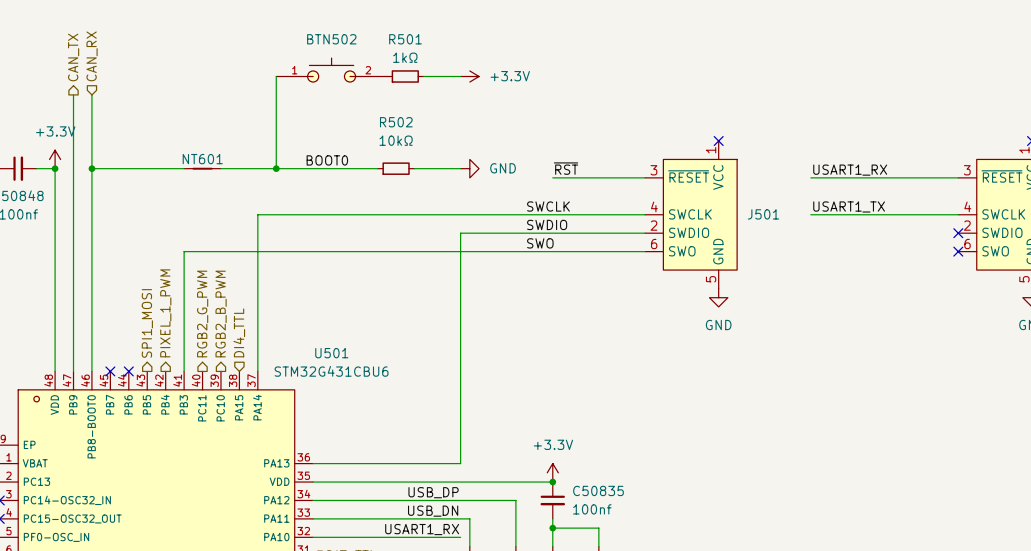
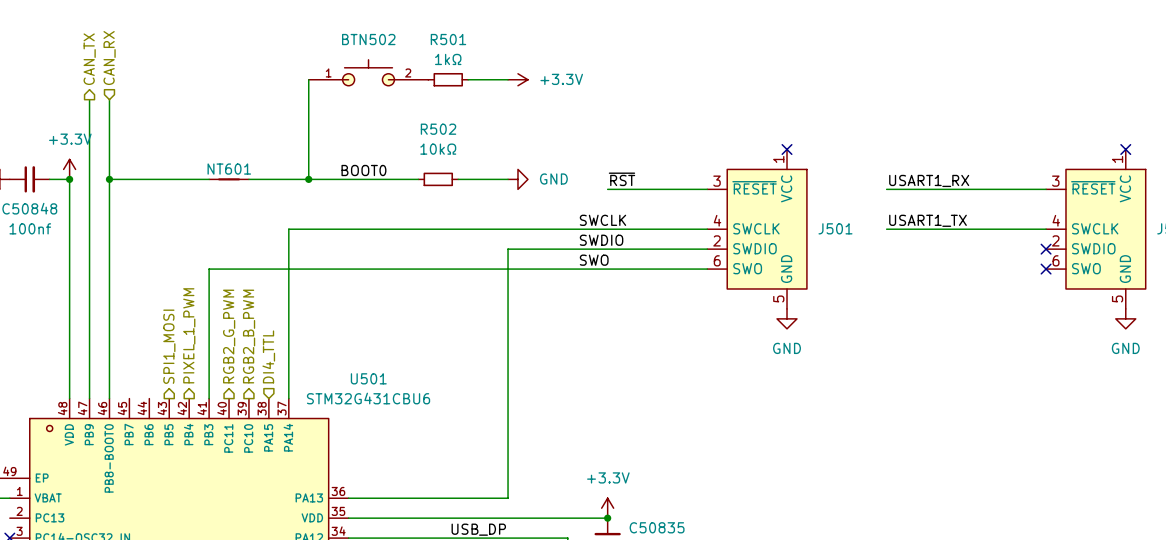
no-connect mark: (110, 371) -> none
no-connect mark: (128, 371) -> none

